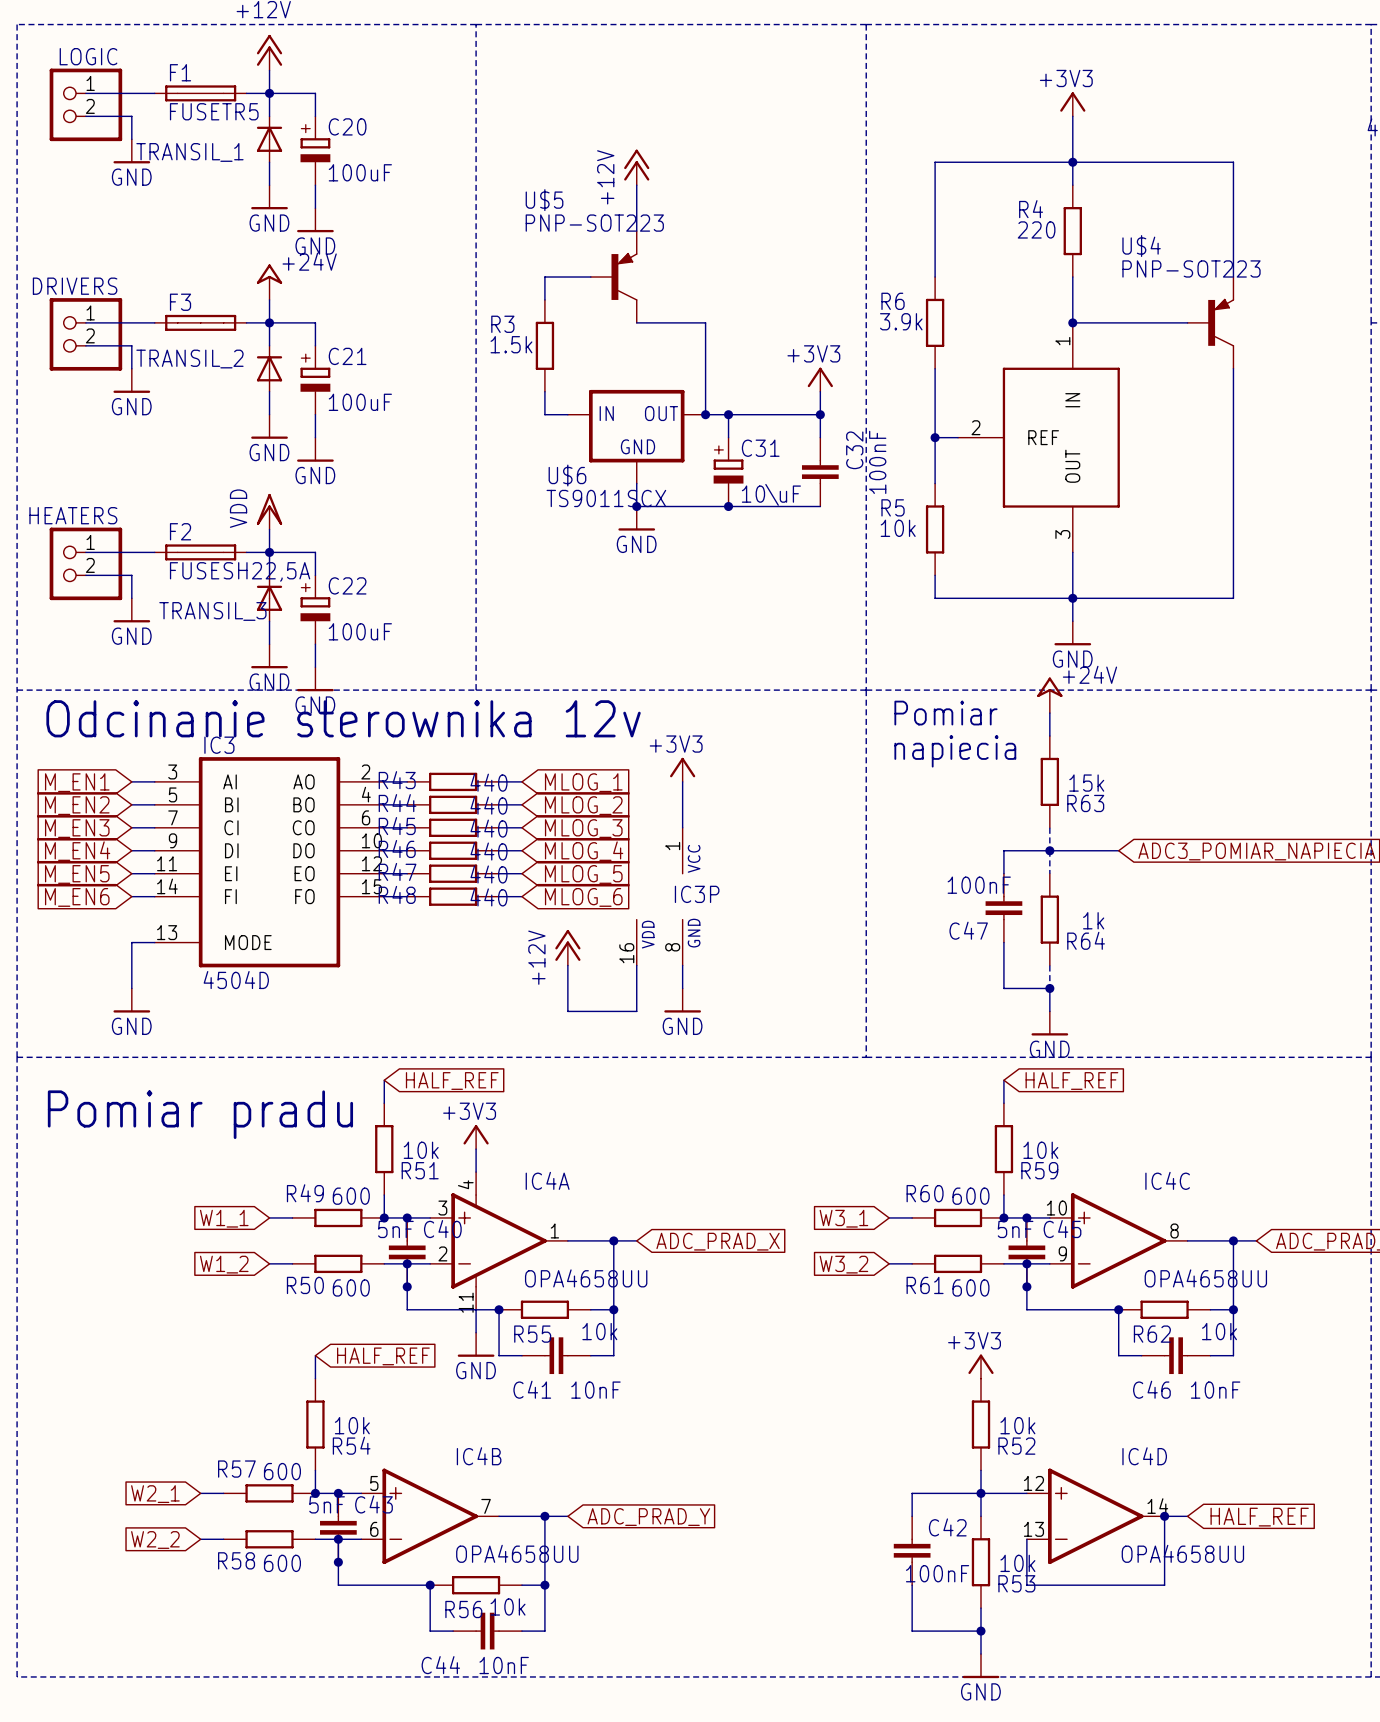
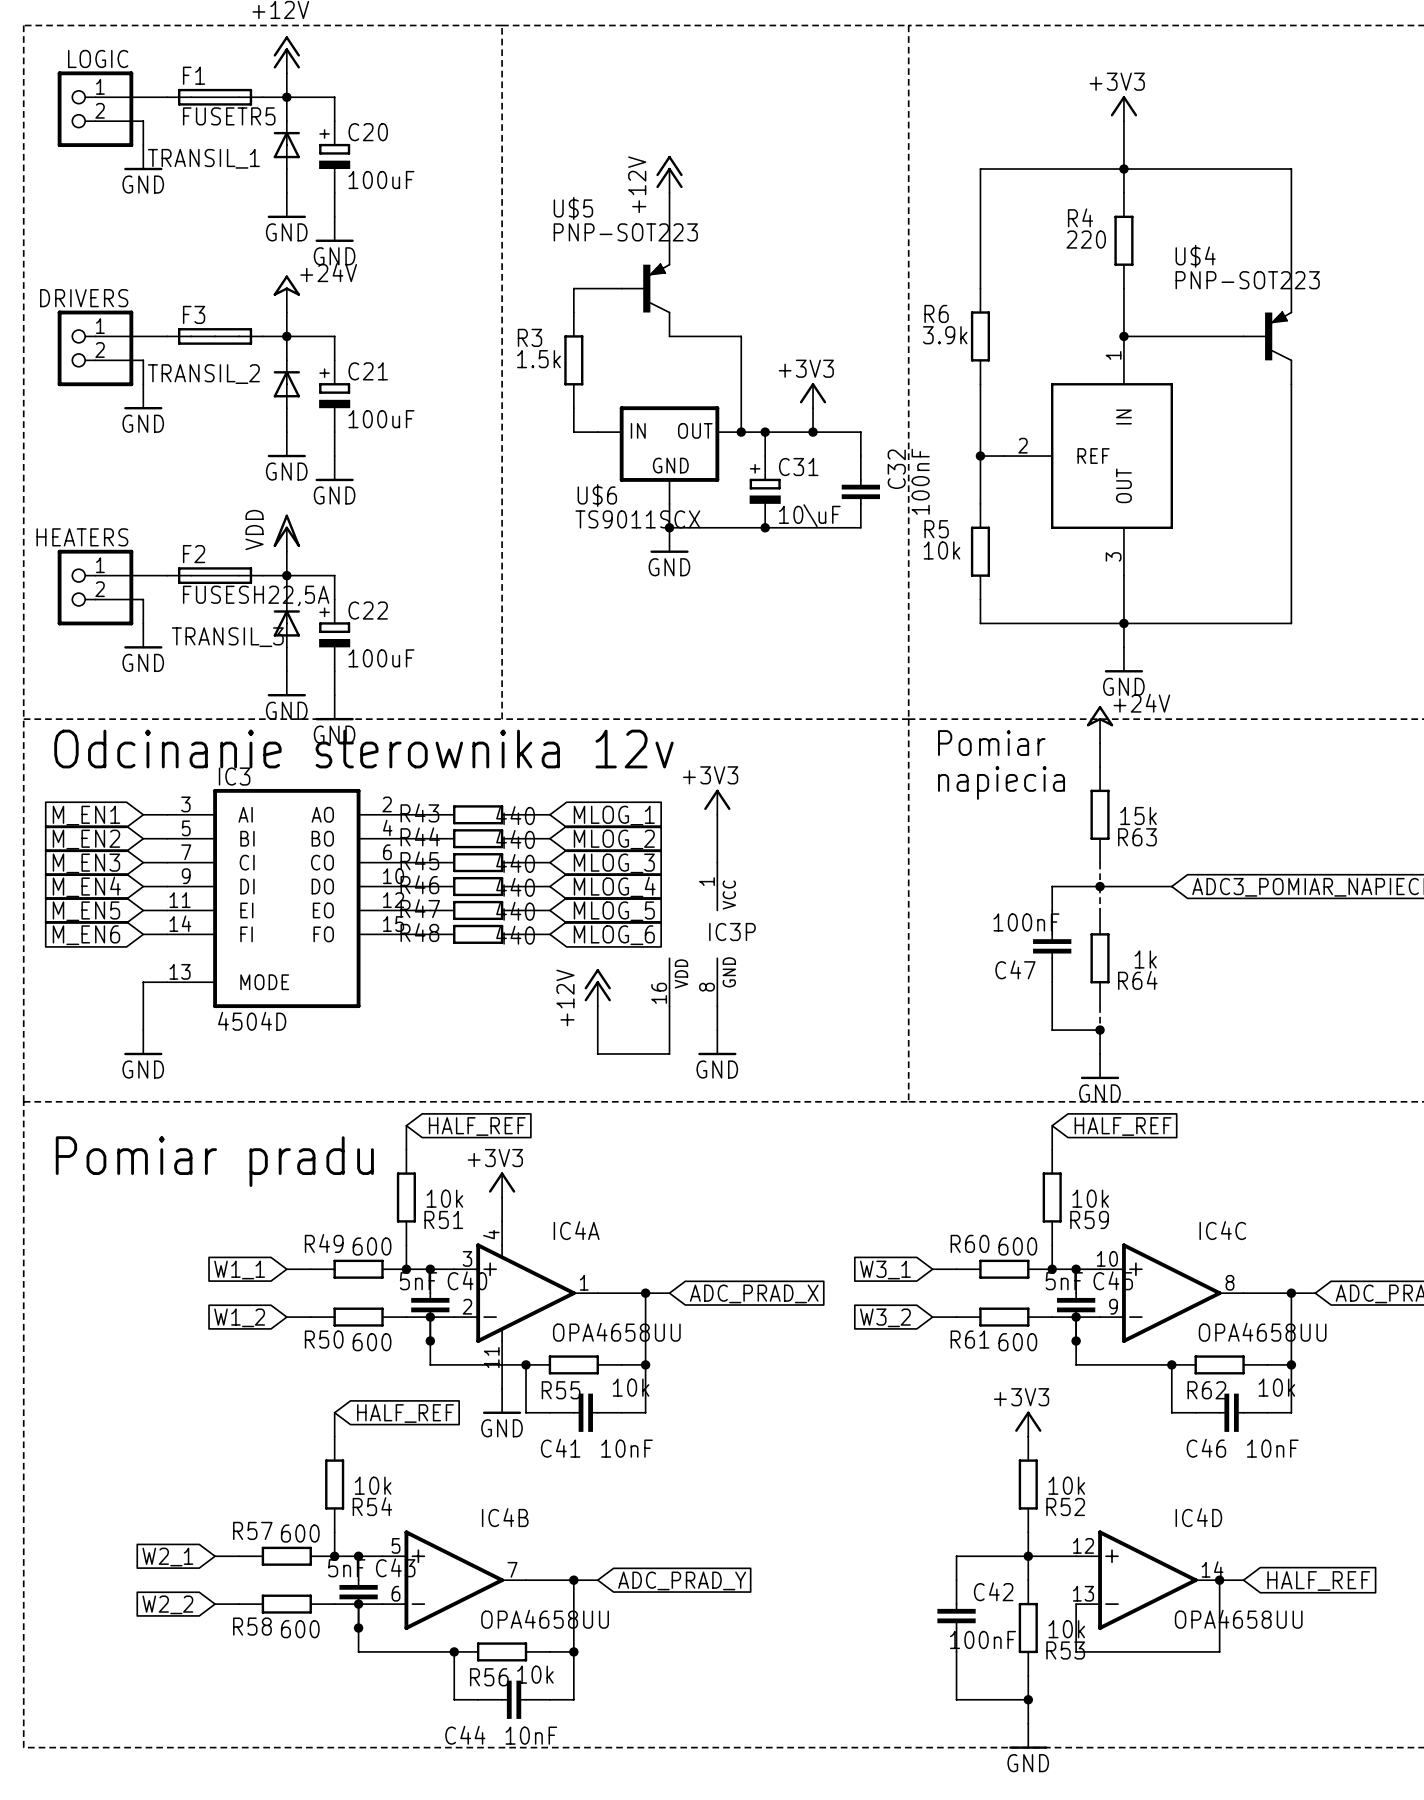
power symbol position: +3V3 (820, 379) -> +3V3 (813, 395)
wire: (820, 391) (820, 414) -> (813, 408) (813, 432)
junction position: (820, 414) -> (813, 432)

